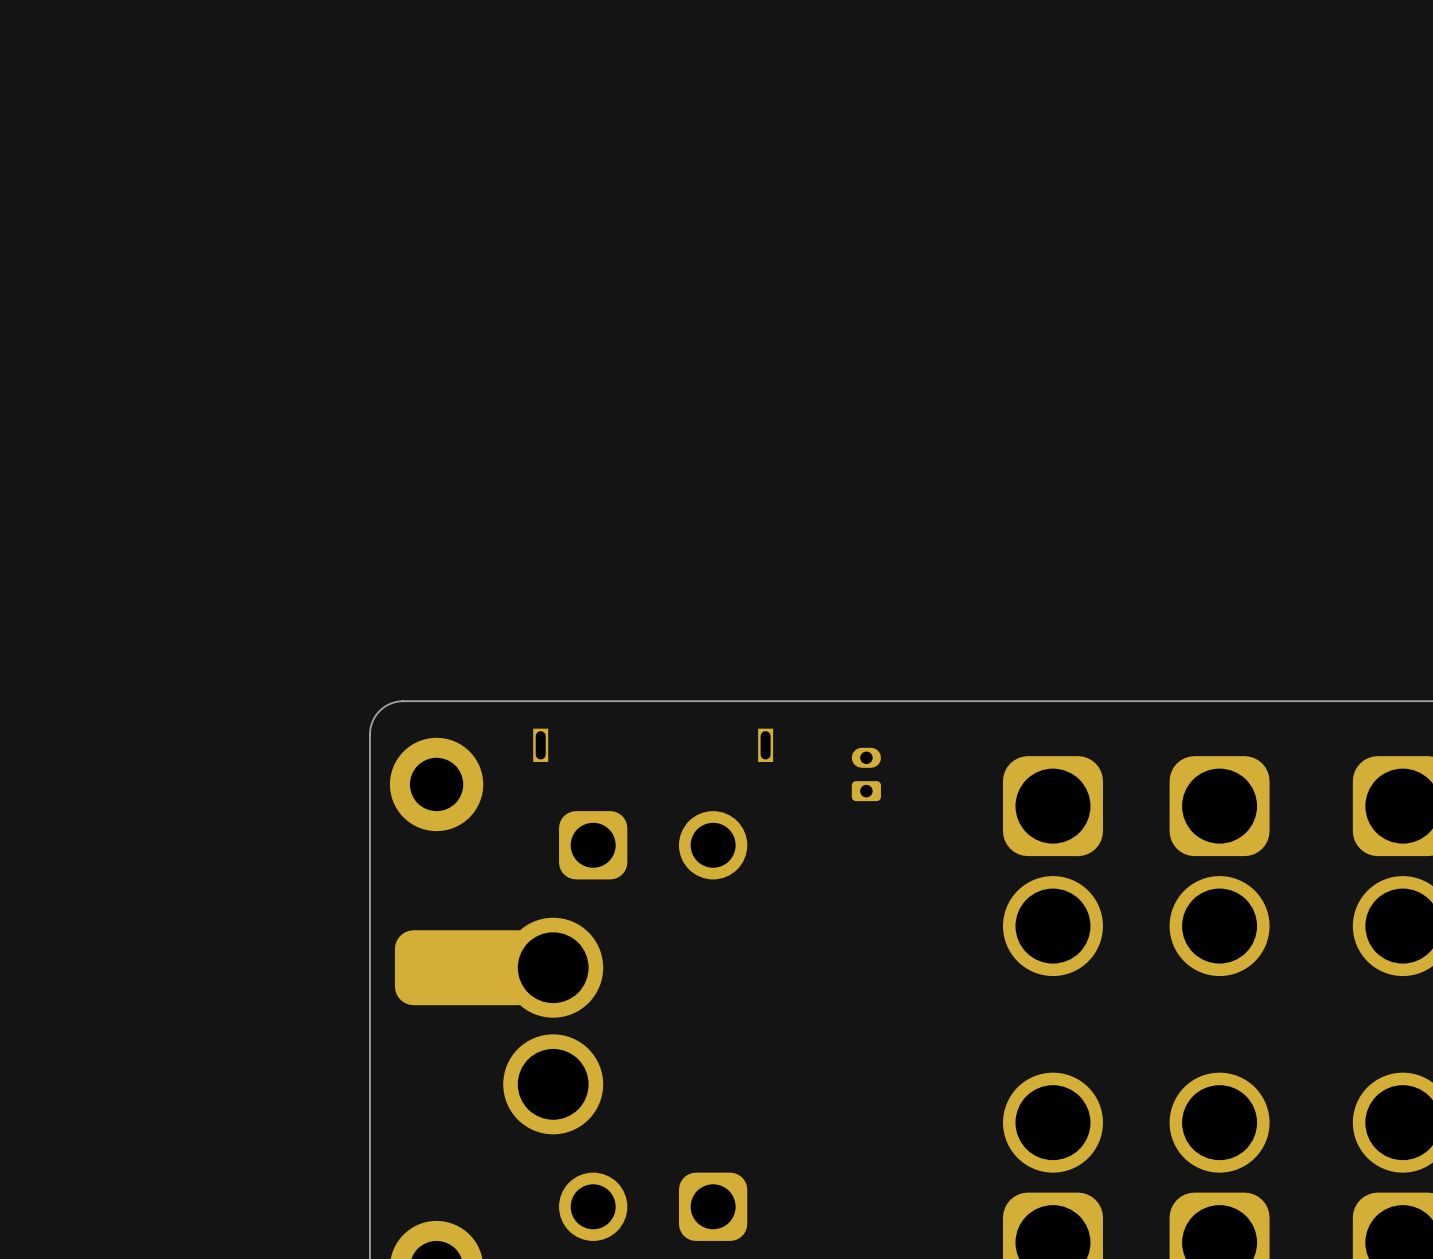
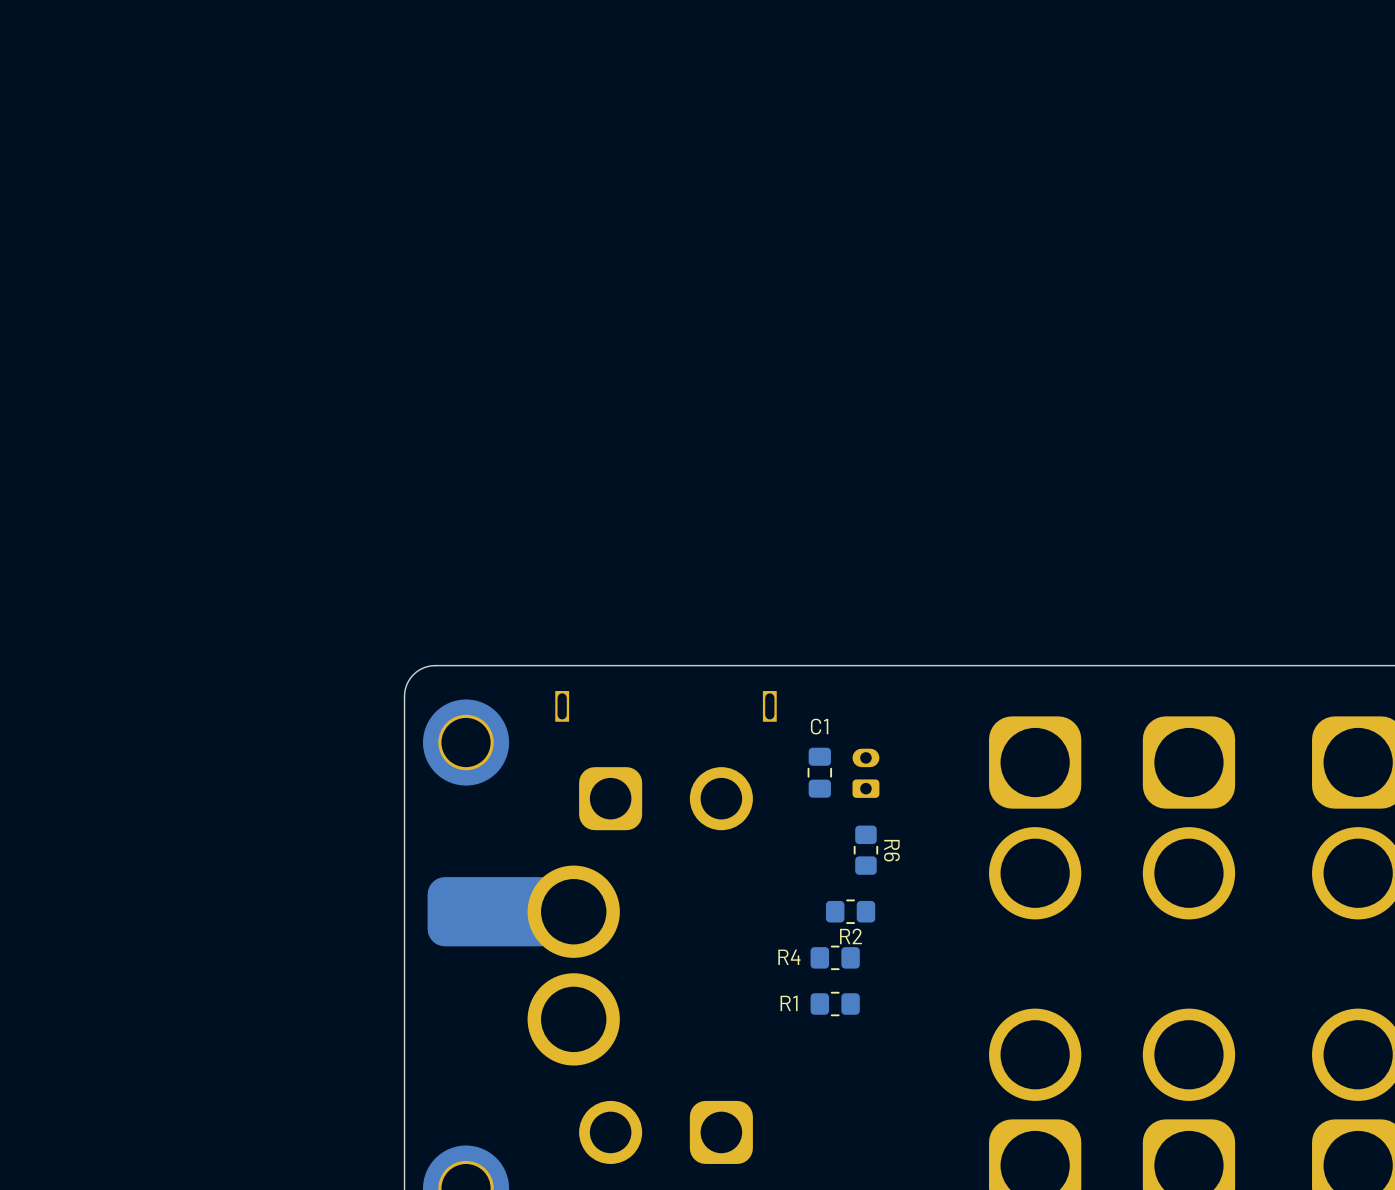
part position: (866, 774) -> (865, 773)
C1: none -> (819, 772)
R6: none -> (865, 850)
R2: none -> (850, 911)
R4: none -> (835, 957)
R1: none -> (835, 1004)

